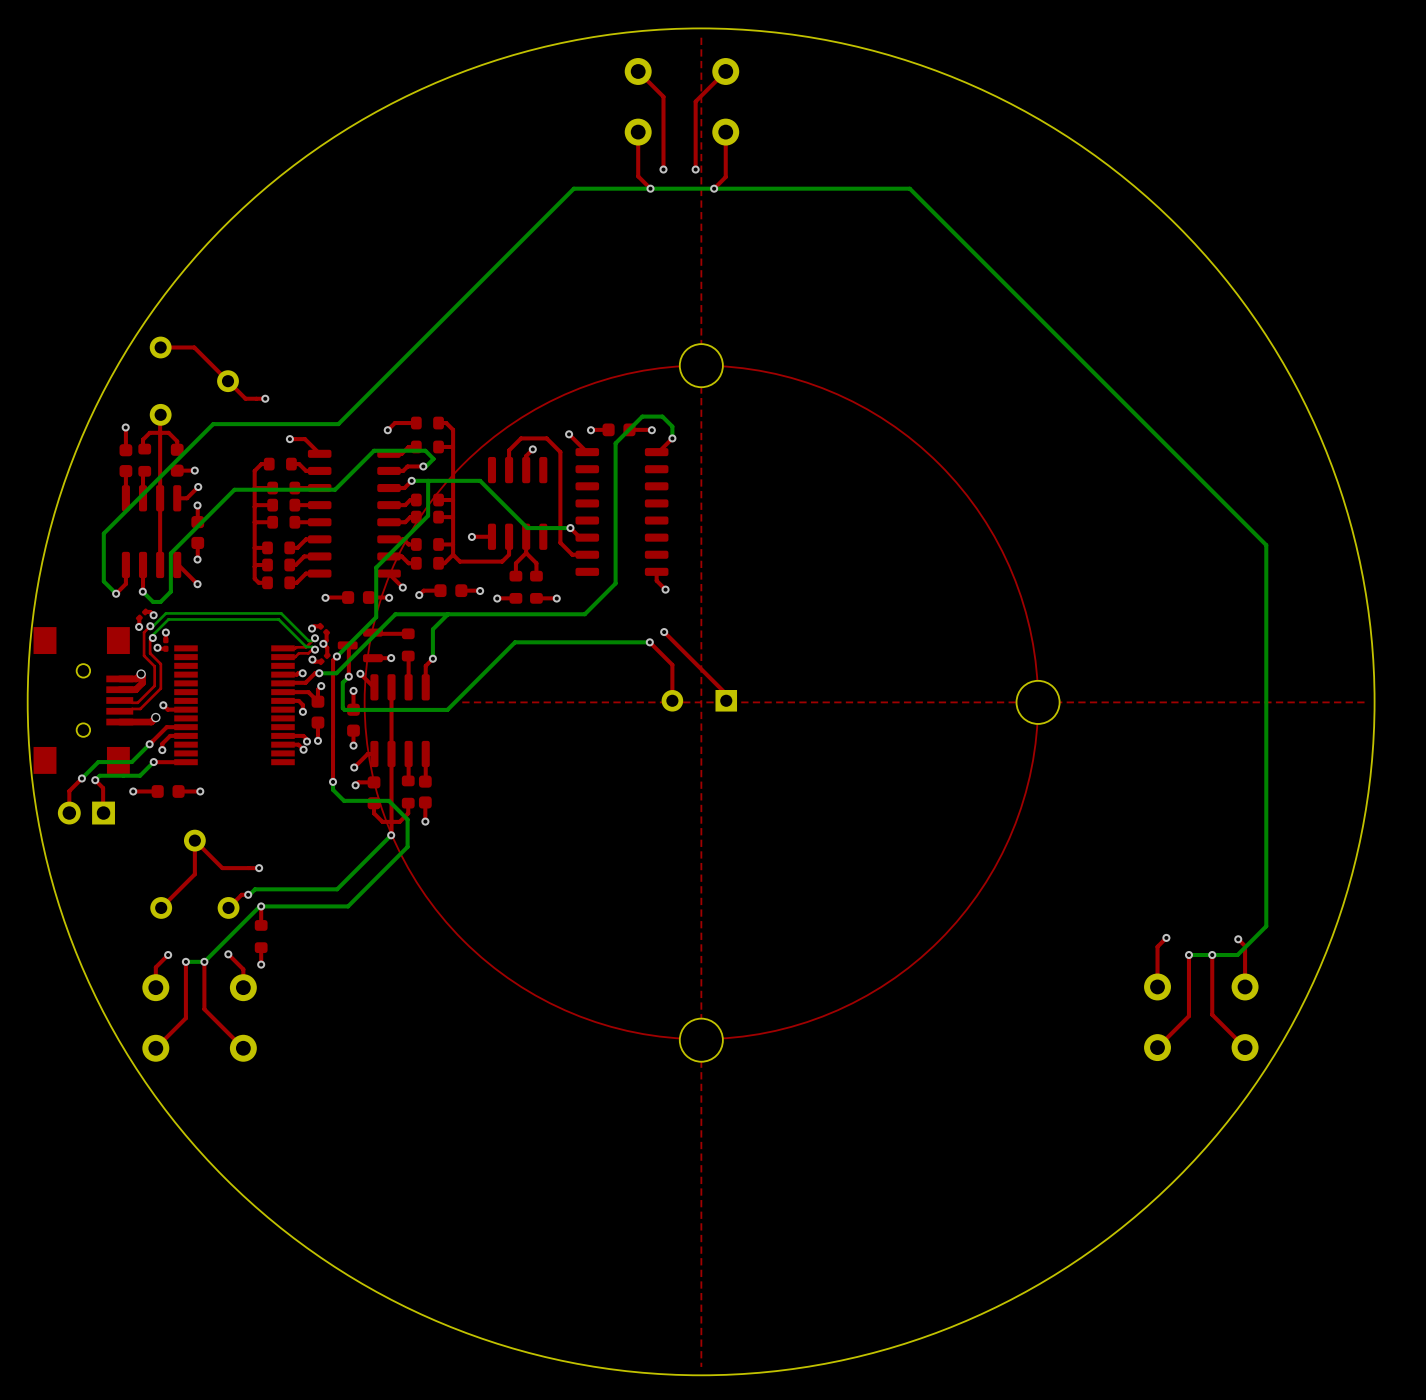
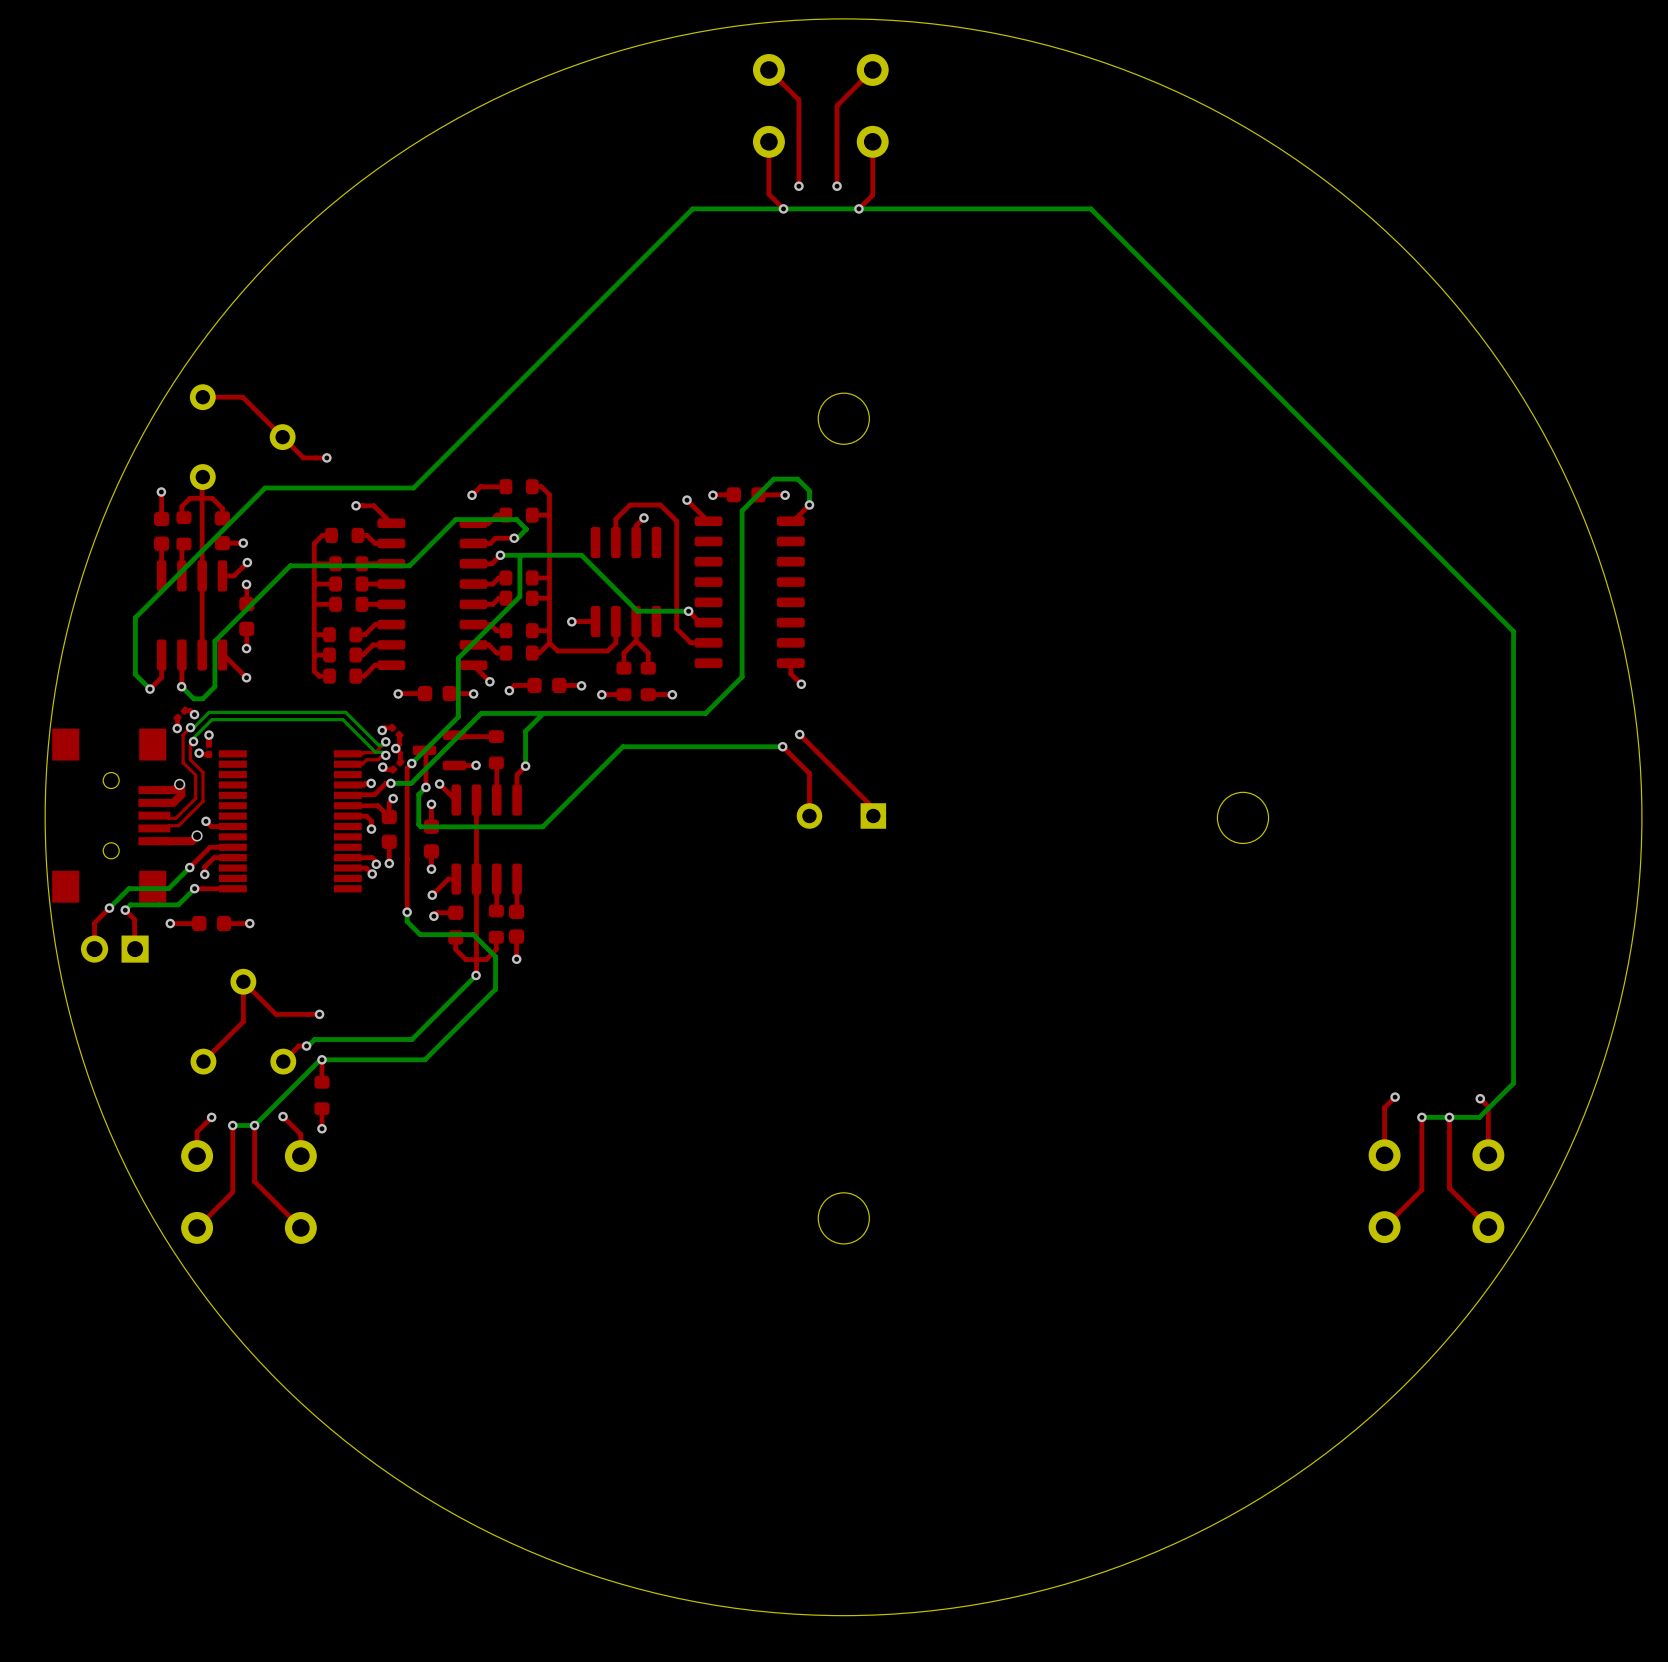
top track: (701, 37) (701, 1366) -> none
drawing: [363, 364, 1039, 1040] -> none
top track: (1367, 702) (462, 702) -> none

